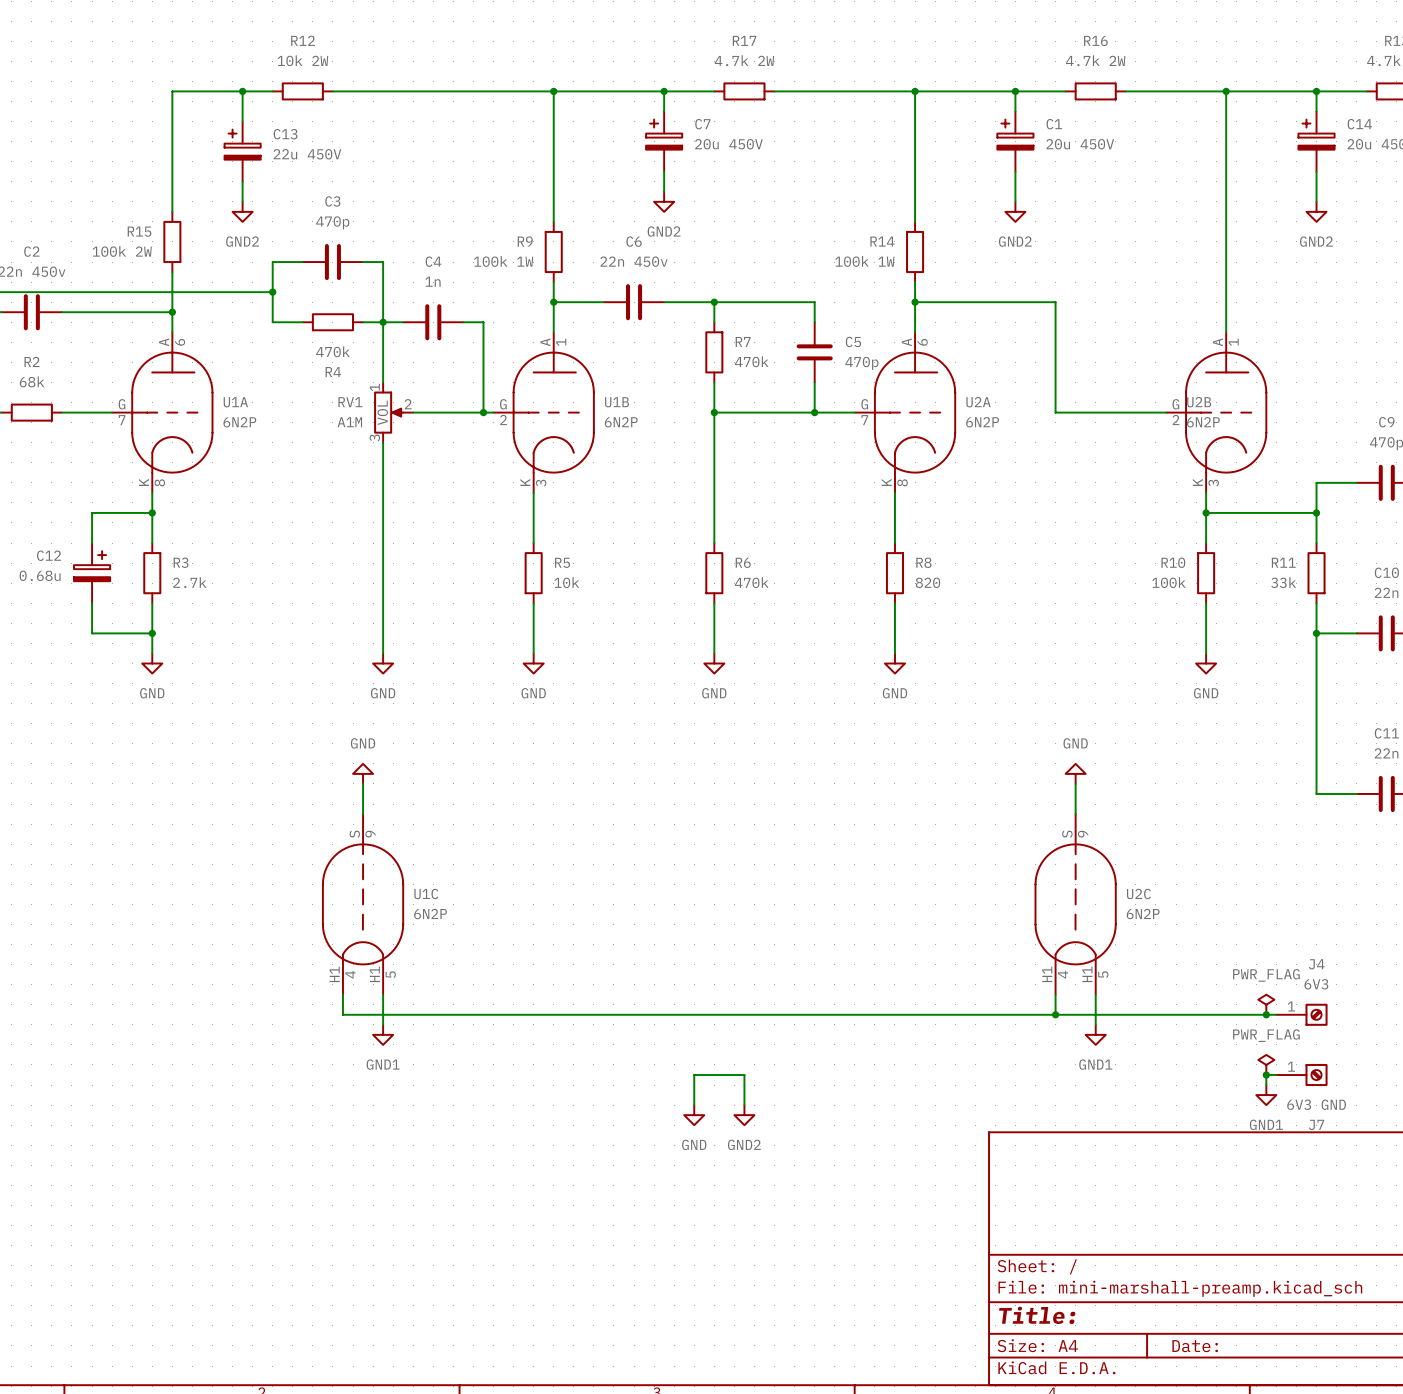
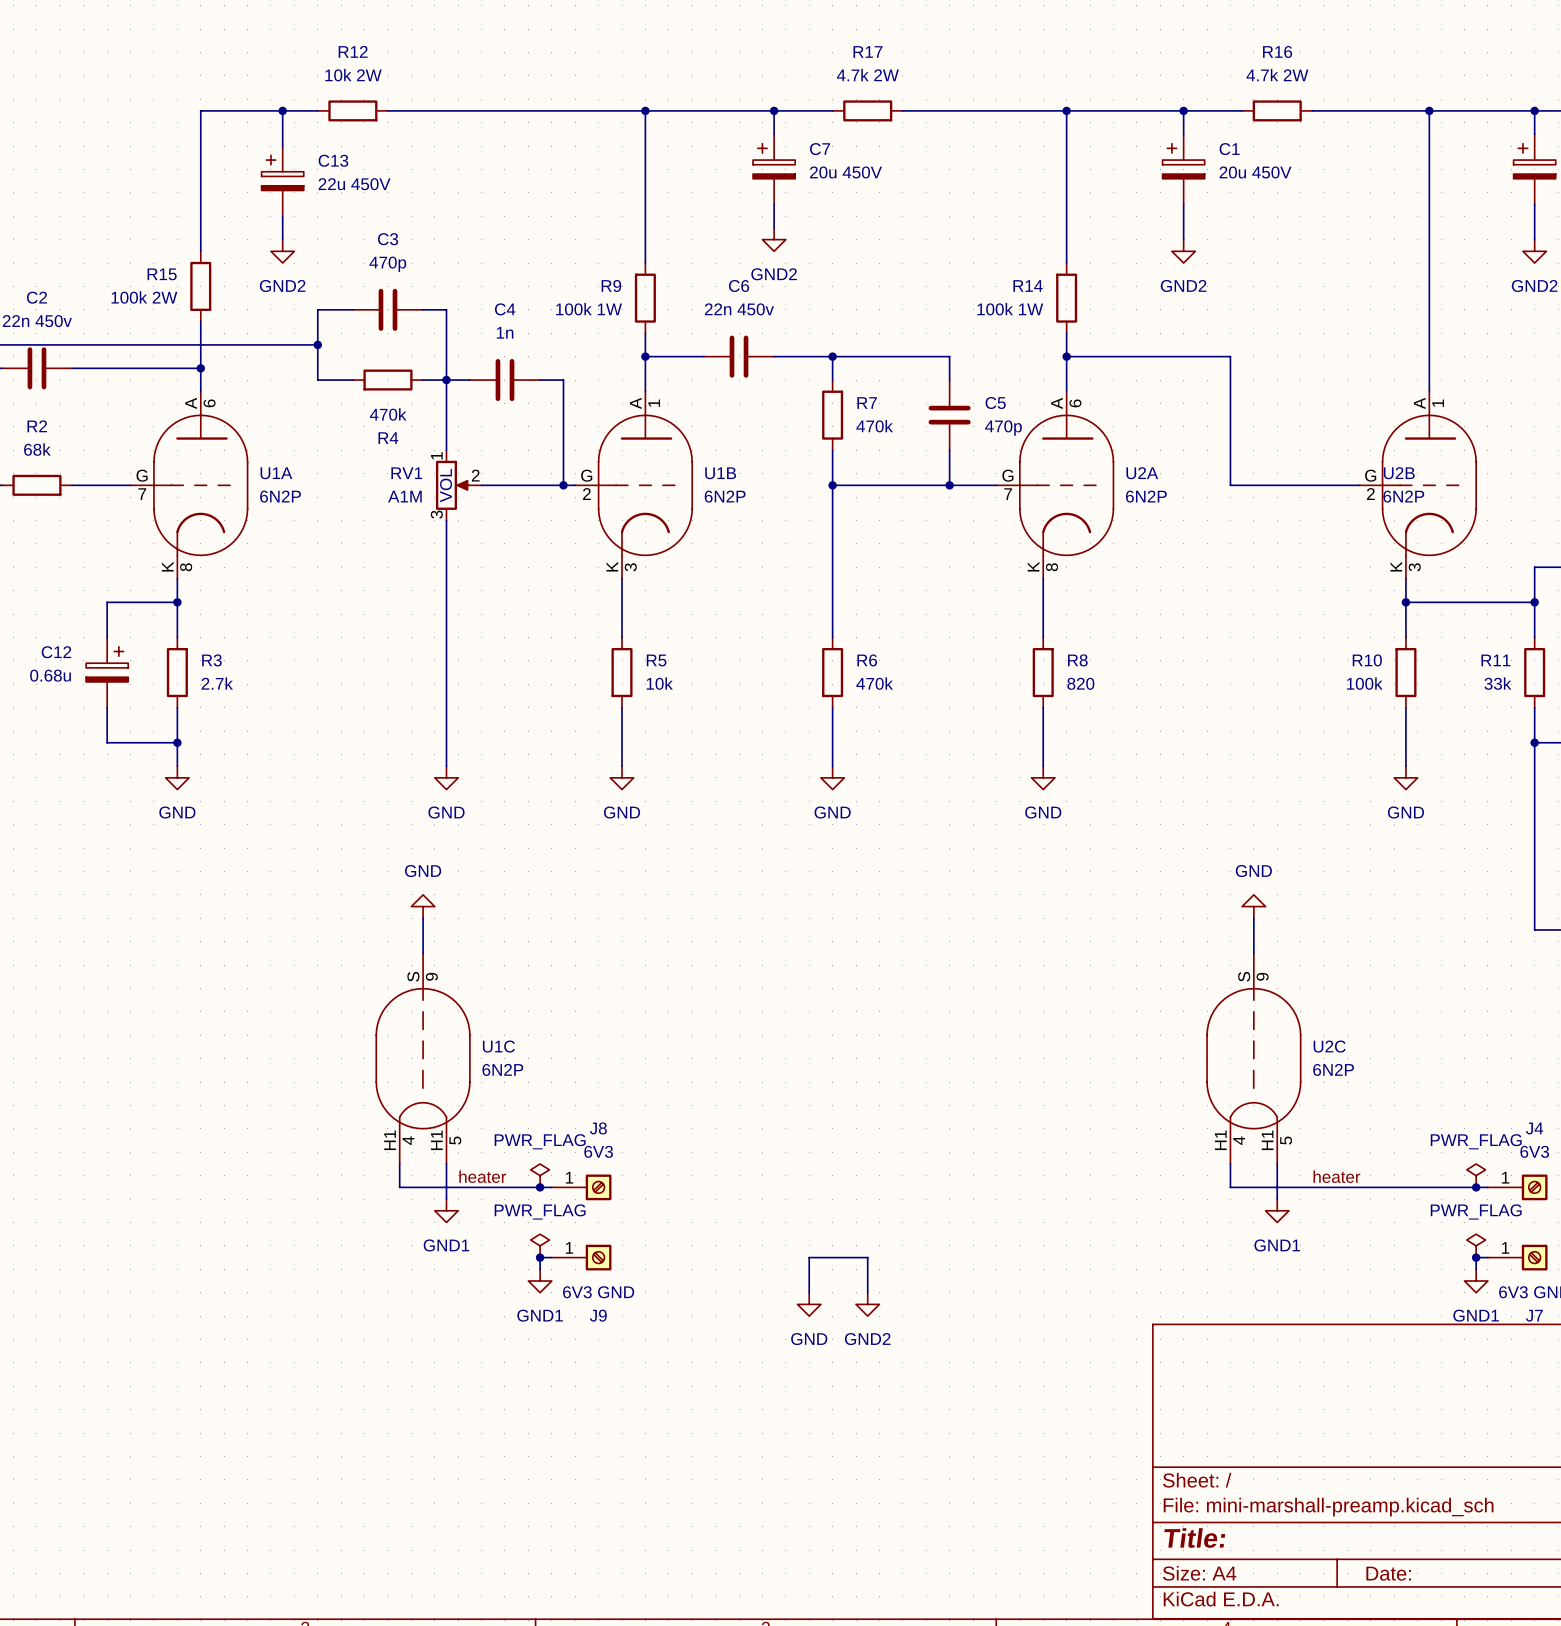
power symbol: none -> PWR_FLAG (540, 1175)
label: none -> heater (482, 1176)
label: none -> heater (1336, 1176)
junction: none -> (540, 1187)
wire: (473, 1014) (1055, 1014) -> none
J8: none -> 6V3 (581, 1187)
junction: (1055, 1014) -> none
power symbol: none -> PWR_FLAG (540, 1245)
junction: none -> (540, 1257)
wire: none -> (551, 1257) (540, 1257) (540, 1269)
J9: none -> 6V3 GND (581, 1257)
power symbol: none -> GND1 (540, 1281)

